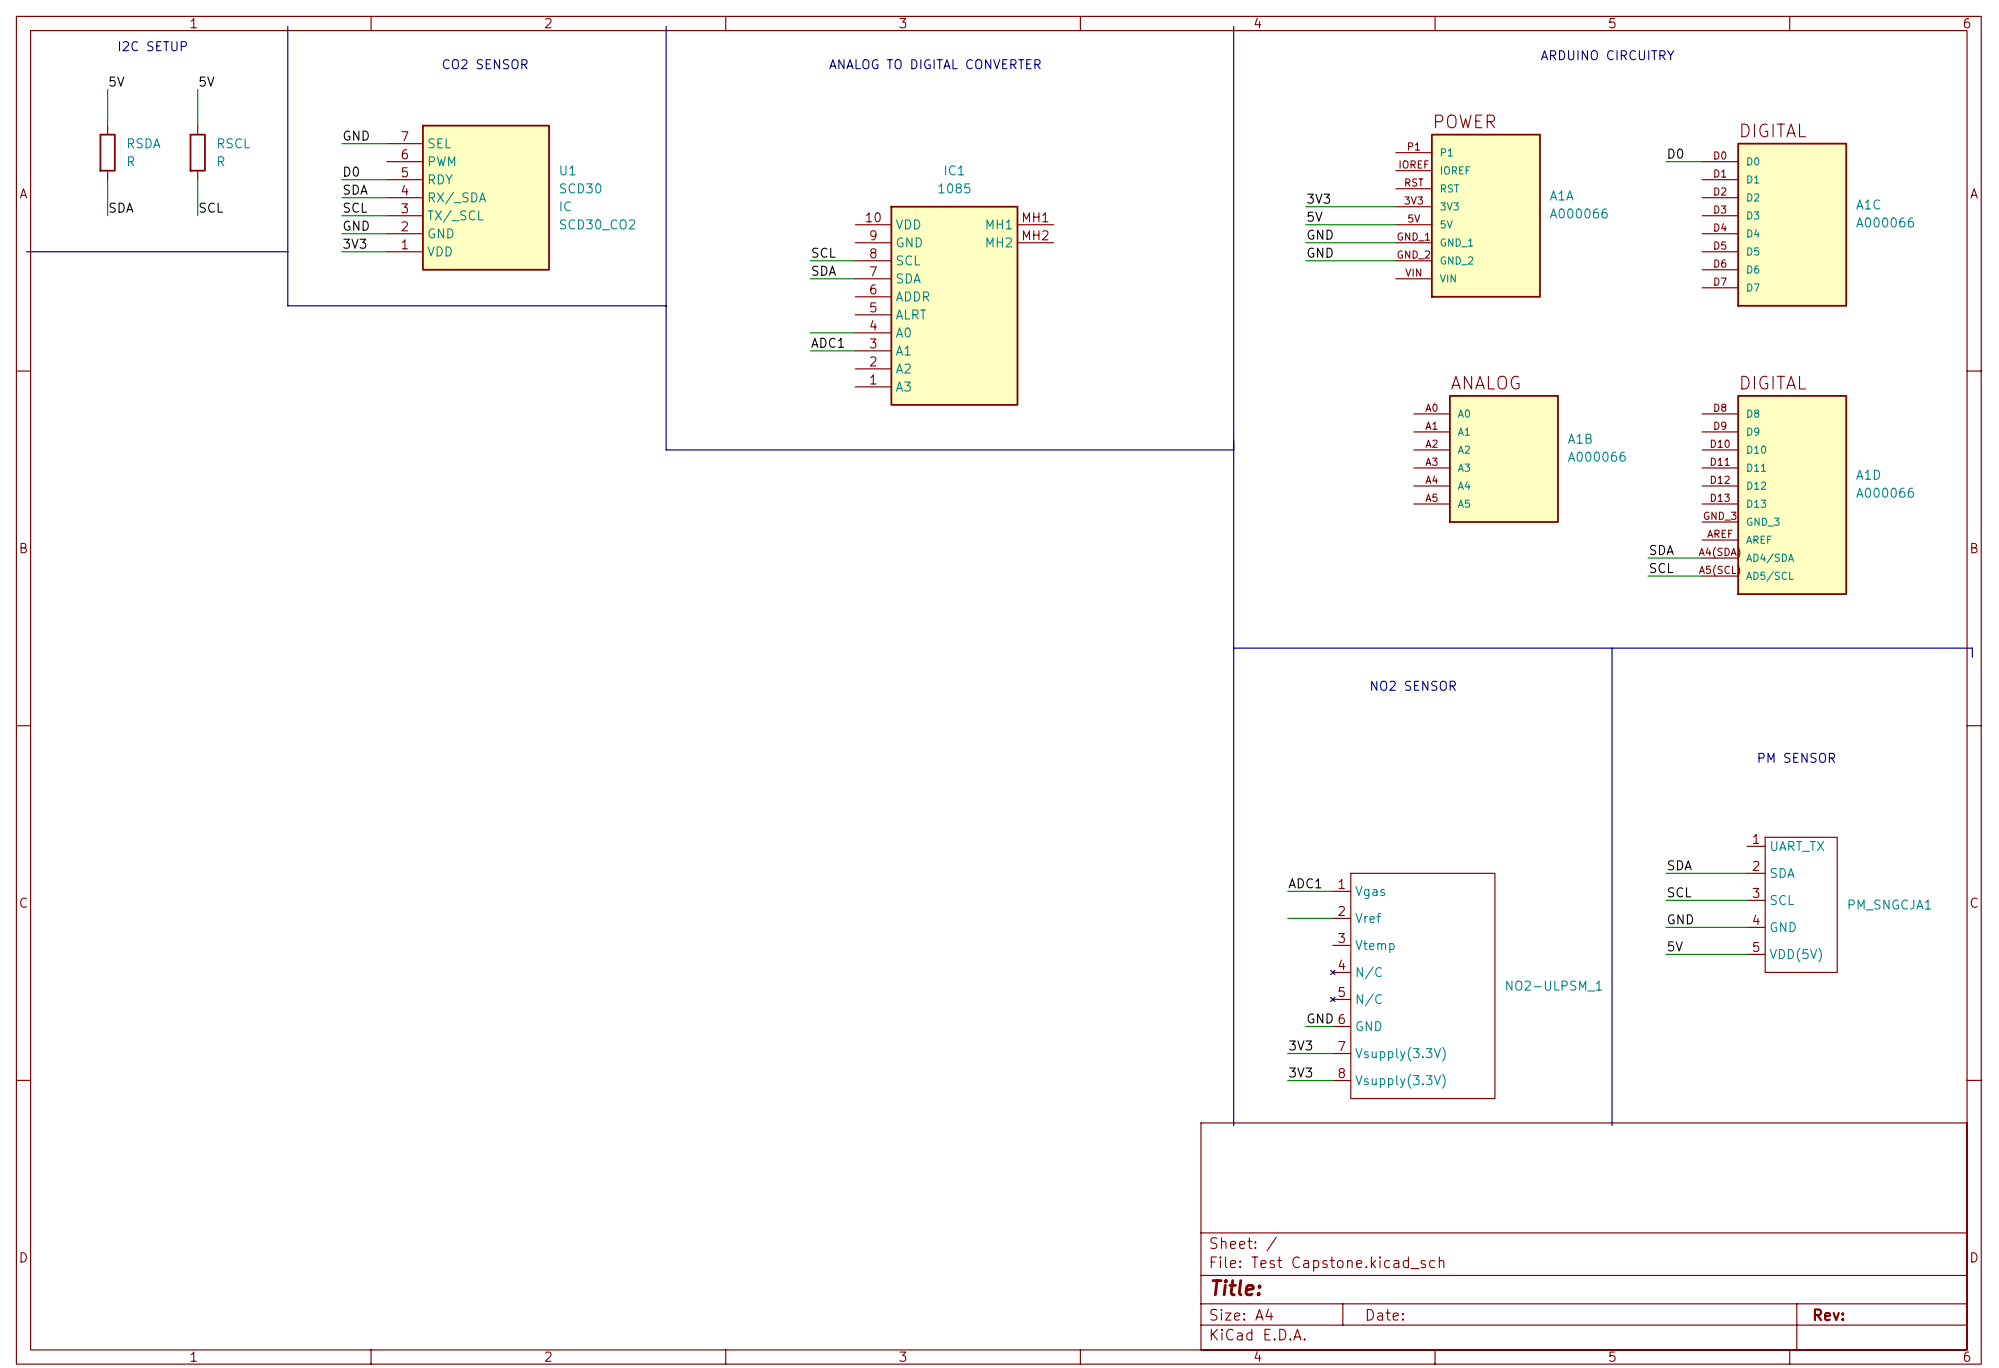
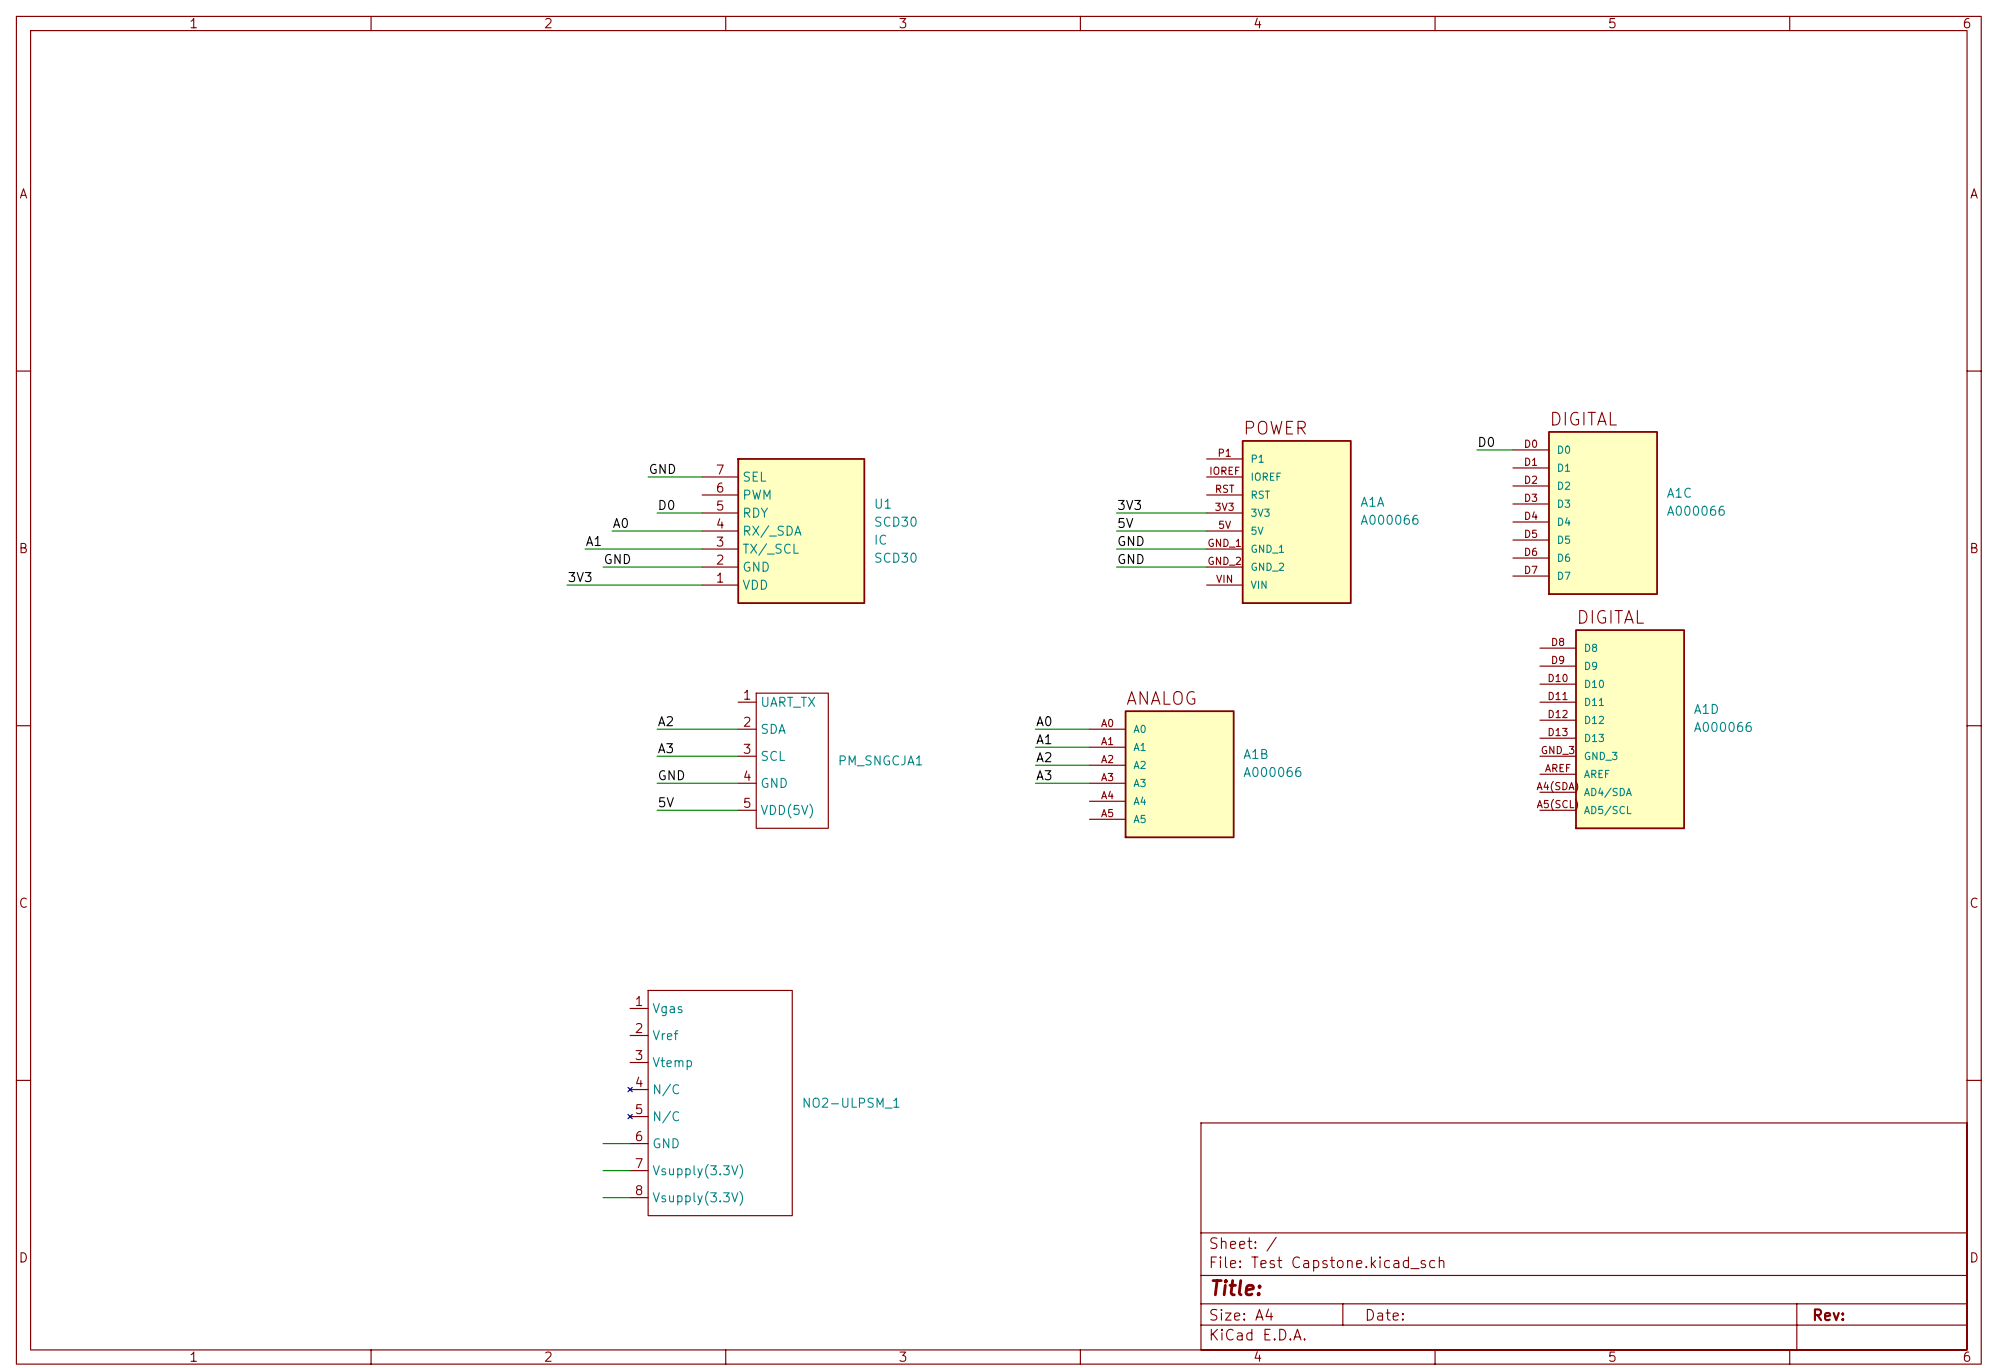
line: (287, 26) (287, 305) (666, 305) -> none
line: (666, 26) (666, 449) (1233, 449) -> none
line: (1233, 26) (1233, 1125) -> none
text: I2C SETUP (152, 46) -> none
text: ARDUINO CIRCUITRY (1607, 55) -> none
text: CO2 SENSOR (485, 64) -> none
text: ANALOG TO DIGITAL CONVERTER (934, 64) -> none
label: 5V (116, 81) -> none
label: 5V (207, 81) -> none
wire: (107, 89) (107, 125) -> none
wire: (197, 89) (197, 125) -> none
label: GND (356, 135) -> none
wire: (341, 143) (386, 143) -> none
RSDA: R (107, 152) -> none
RSCL: R (197, 152) -> none
label: D0 (1675, 153) -> none
wire: (1666, 161) (1702, 161) -> none
label: D0 (351, 171) -> none
wire: (107, 179) (107, 215) -> none
wire: (197, 179) (197, 215) -> none
wire: (341, 179) (386, 179) -> none
label: SDA (355, 189) -> none
wire: (341, 197) (386, 197) -> none
U1 position: (468, 197) -> (783, 531)
label: 3V3 (1318, 198) -> none
wire: (1305, 206) (1395, 206) -> none
label: SDA (121, 207) -> none
label: SCL (211, 207) -> none
label: SCL (355, 207) -> none
wire: (341, 215) (386, 215) -> none
A1A position: (1468, 215) -> (1279, 522)
label: 5V (1315, 216) -> none
U1 text: SCD30_CO2 (597, 224) -> SCD30 (895, 557)
wire: (1305, 224) (1395, 224) -> none
A1C position: (1774, 224) -> (1585, 513)
label: GND (356, 225) -> none
wire: (341, 233) (386, 233) -> none
label: GND (1320, 234) -> none
wire: (1305, 242) (1395, 242) -> none
label: 3V3 (354, 243) -> none
line: (26, 251) (287, 251) -> none
wire: (341, 251) (386, 251) -> none
label: SCL (823, 252) -> none
label: GND (1320, 252) -> none
wire: (810, 260) (855, 260) -> none
wire: (1305, 260) (1395, 260) -> none
label: SDA (824, 270) -> none
wire: (810, 278) (855, 278) -> none
IC1: 1085 (954, 305) -> none
wire: (810, 332) (855, 332) -> none
label: ADC1 (827, 342) -> none
wire: (810, 350) (855, 350) -> none
label: none -> D0 (1486, 441)
A1B position: (1486, 458) -> (1162, 774)
label: none -> GND (662, 468)
wire: none -> (648, 476) (702, 476)
A1D position: (1774, 494) -> (1612, 729)
label: none -> D0 (666, 504)
label: none -> 3V3 (1129, 504)
wire: none -> (657, 513) (702, 513)
wire: none -> (1116, 513) (1206, 513)
label: none -> A0 (620, 522)
label: none -> 5V (1125, 522)
wire: none -> (612, 531) (702, 531)
wire: none -> (1116, 531) (1206, 531)
label: none -> A1 (593, 541)
label: none -> GND (1131, 541)
wire: none -> (585, 549) (702, 549)
wire: none -> (1116, 549) (1206, 549)
label: SDA (1661, 550) -> none
wire: (1648, 558) (1702, 558) -> none
label: none -> GND (617, 559)
label: none -> GND (1131, 559)
wire: none -> (603, 567) (702, 567)
wire: none -> (1116, 567) (1206, 567)
label: SCL (1661, 568) -> none
wire: (1648, 576) (1702, 576) -> none
label: none -> 3V3 (579, 577)
wire: none -> (567, 585) (702, 585)
line: (1233, 648) (1972, 648) (1972, 657) -> none
line: (1612, 648) (1612, 1125) -> none
text: NO2 SENSOR (1413, 685) -> none
label: none -> A2 (665, 721)
label: none -> A0 (1043, 721)
wire: none -> (657, 729) (738, 729)
wire: none -> (1035, 729) (1089, 729)
label: none -> A1 (1043, 739)
wire: none -> (1035, 747) (1089, 747)
label: none -> A3 (665, 748)
wire: none -> (657, 756) (738, 756)
label: none -> A2 (1043, 757)
text: PM SENSOR (1796, 757) -> none
wire: none -> (1035, 765) (1089, 765)
label: none -> GND (671, 775)
label: none -> A3 (1043, 775)
wire: none -> (657, 783) (738, 783)
wire: none -> (1035, 783) (1089, 783)
label: none -> 5V (666, 802)
wire: none -> (657, 810) (738, 810)
label: SDA (1679, 865) -> none
wire: (1666, 873) (1747, 873) -> none
label: ADC1 (1305, 883) -> none
wire: (1287, 891) (1332, 891) -> none
label: SCL (1679, 892) -> none
wire: (1666, 900) (1747, 900) -> none
PM_SNGCJA1 position: (1792, 904) -> (783, 760)
wire: (1287, 918) (1332, 918) -> none
label: GND (1680, 919) -> none
wire: (1666, 927) (1747, 927) -> none
label: 5V (1675, 946) -> none
wire: (1666, 954) (1747, 954) -> none
NO2-ULPSM_1 position: (1412, 985) -> (710, 1103)
label: GND (1320, 1018) -> none
wire: (1305, 1026) (1332, 1026) -> none
label: 3V3 (1300, 1045) -> none
wire: (1287, 1053) (1332, 1053) -> none
label: 3V3 (1300, 1072) -> none
wire: (1287, 1080) (1332, 1080) -> none
wire: none -> (603, 1143) (630, 1143)
wire: none -> (603, 1170) (630, 1170)
wire: none -> (603, 1197) (630, 1197)

